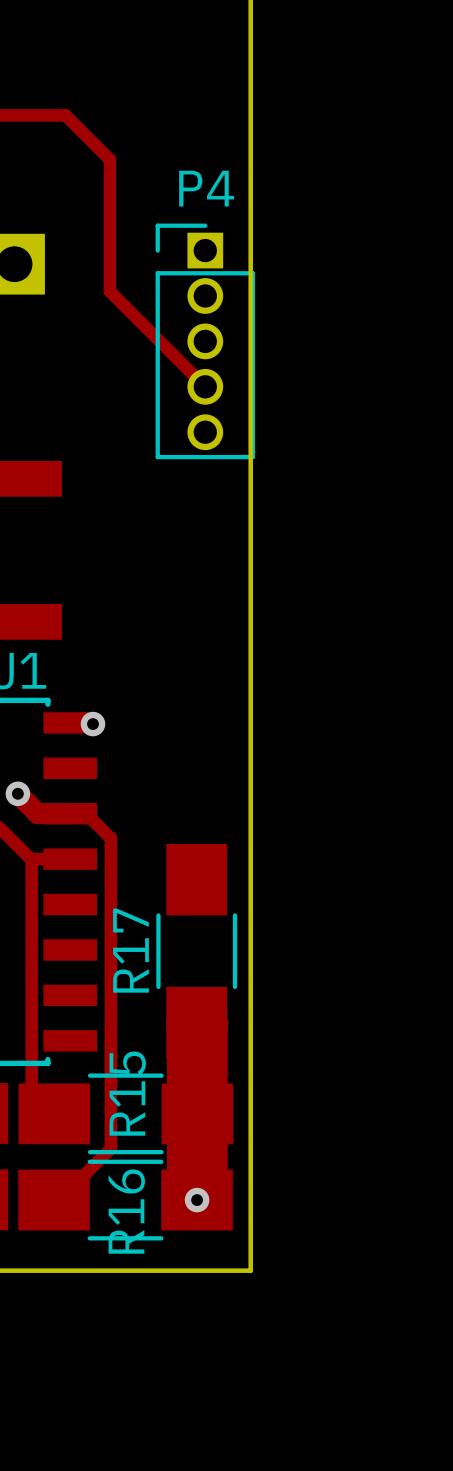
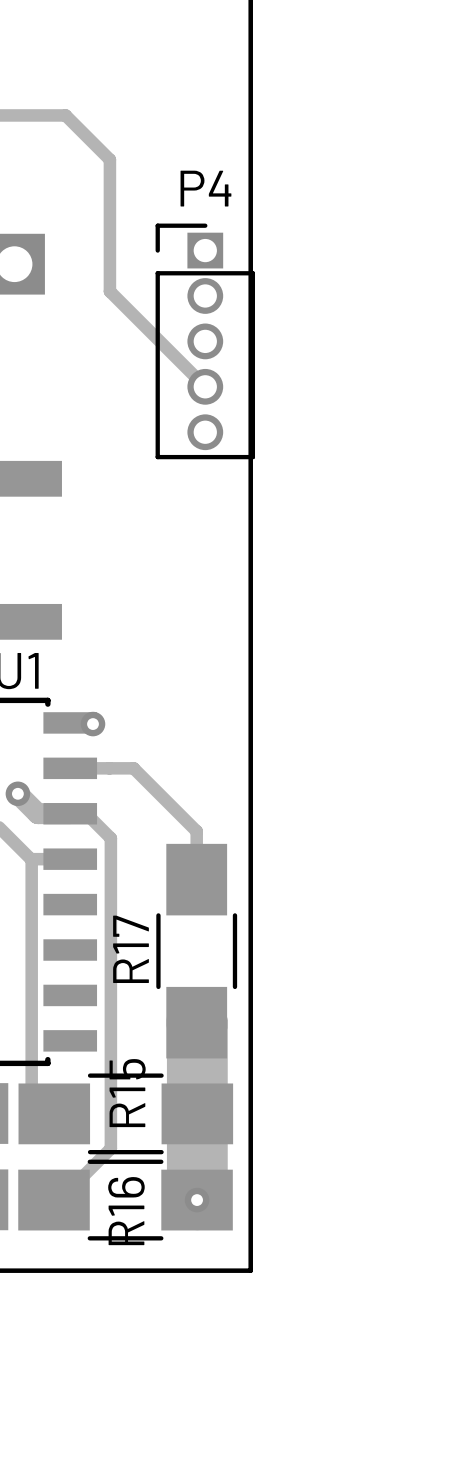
track: none -> (70, 768) (133, 768) (196, 831) (196, 879)

